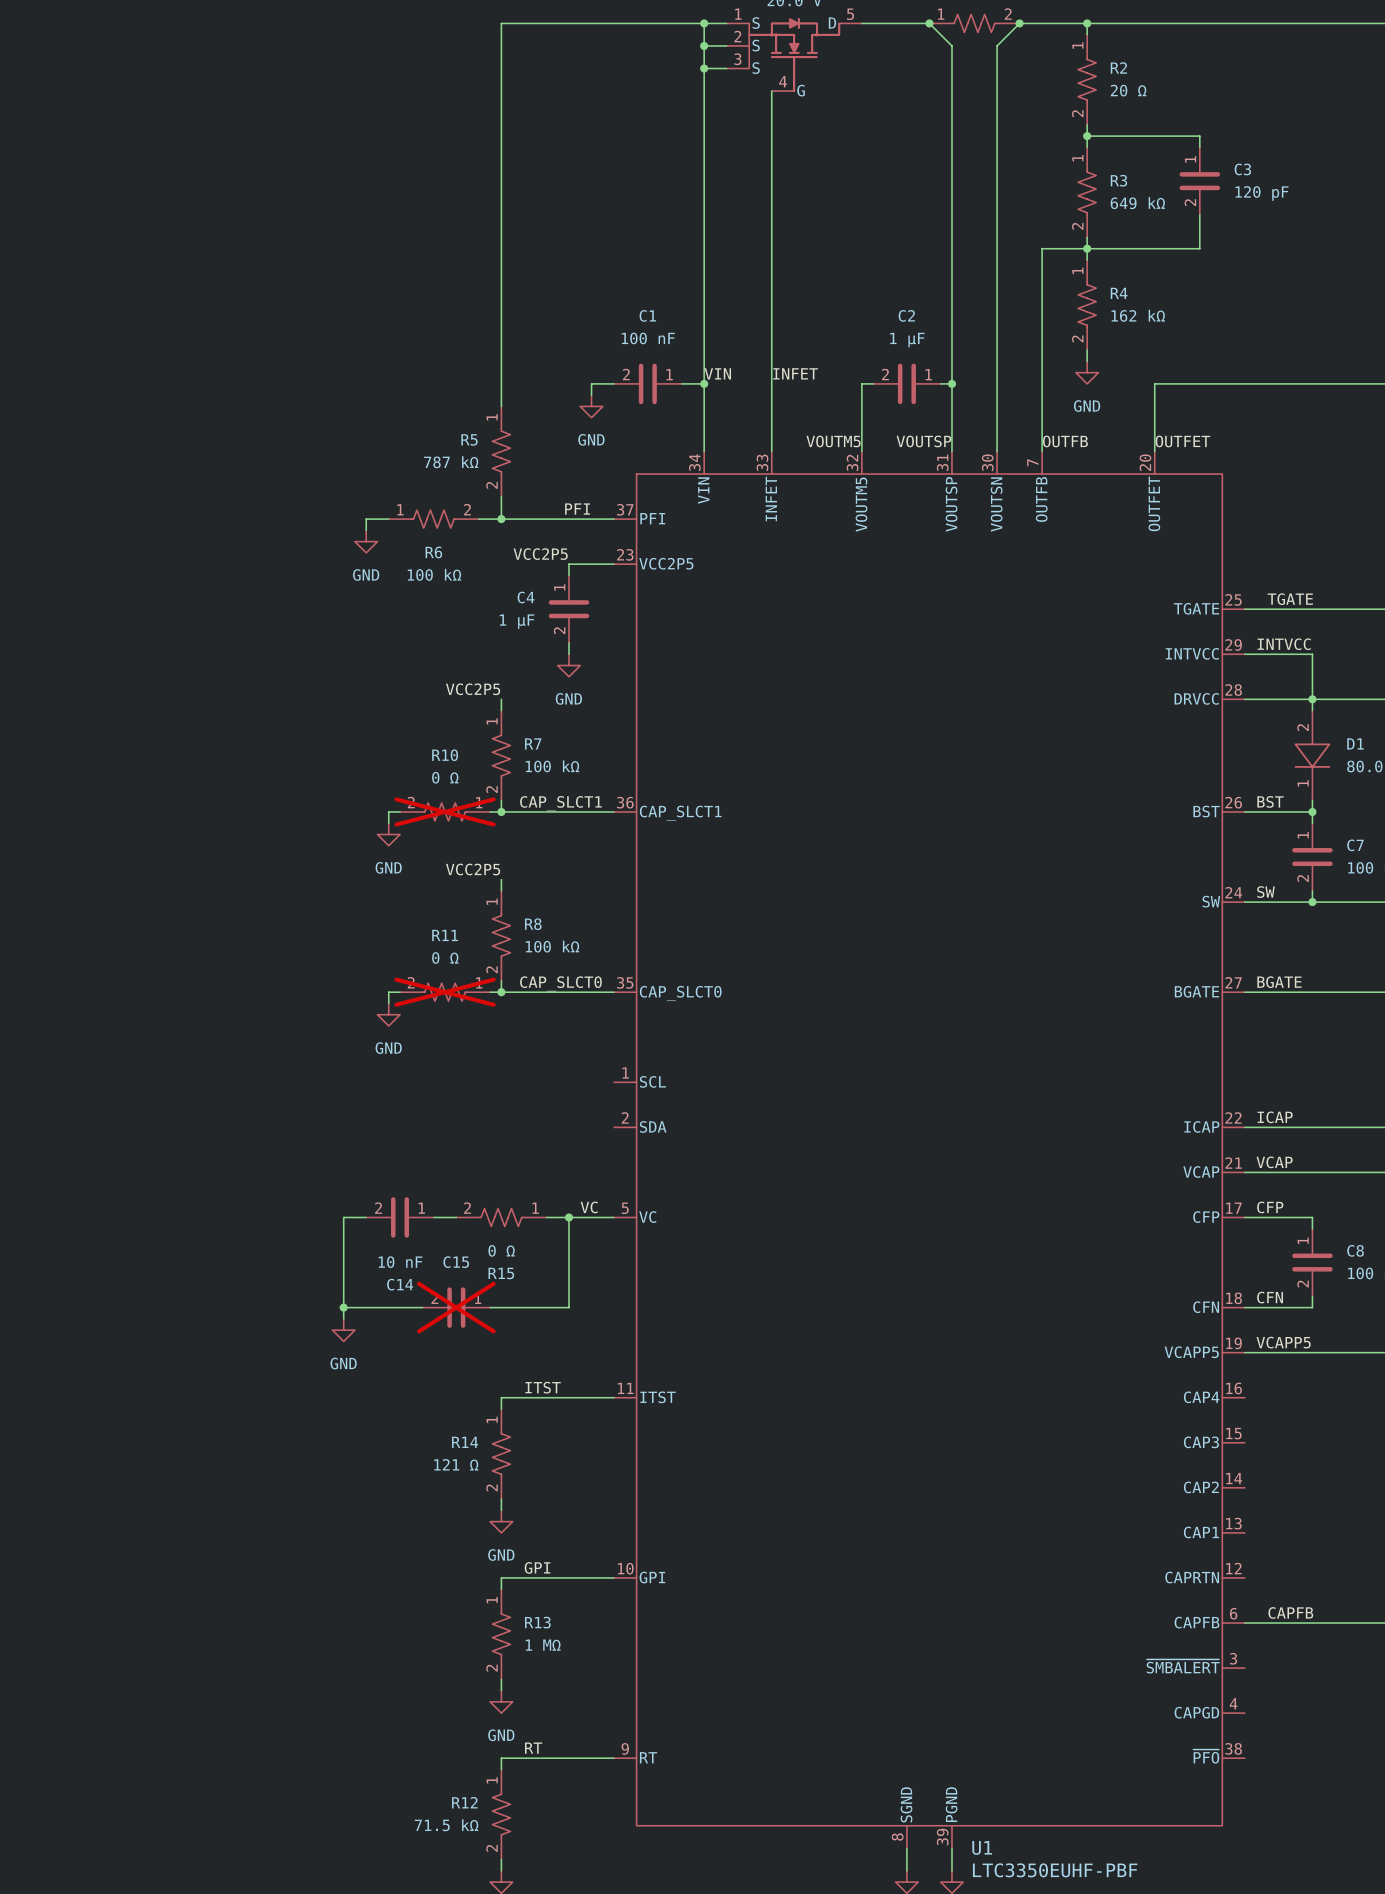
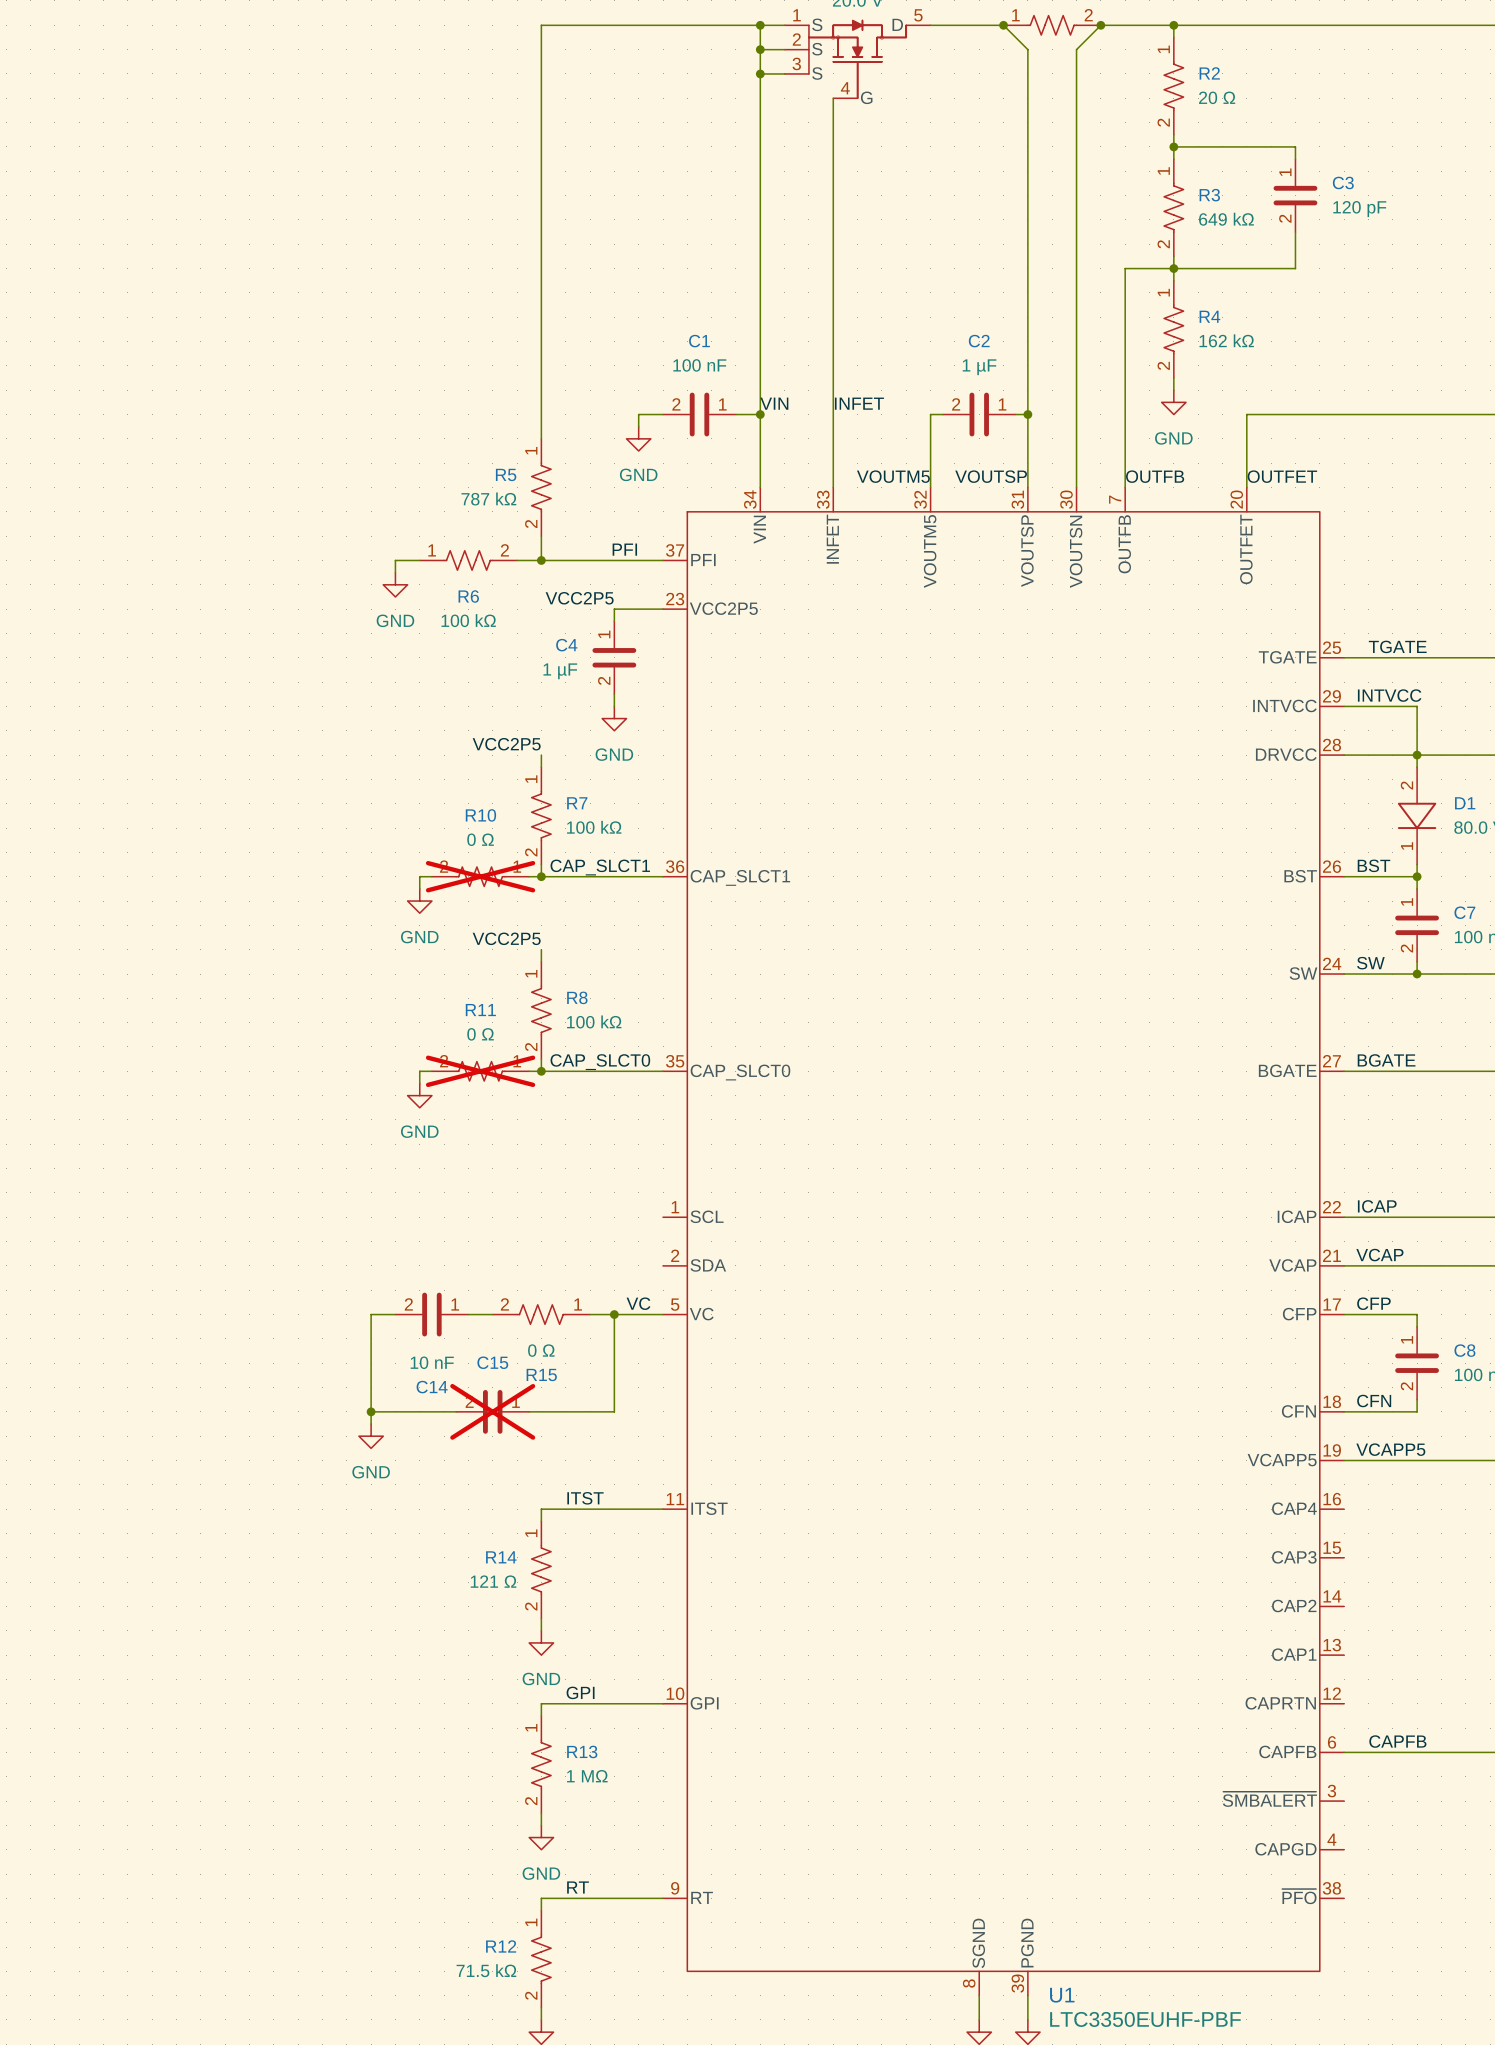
U1 symbol: [614, 451, 1245, 1849] -> [663, 487, 1345, 1996]

